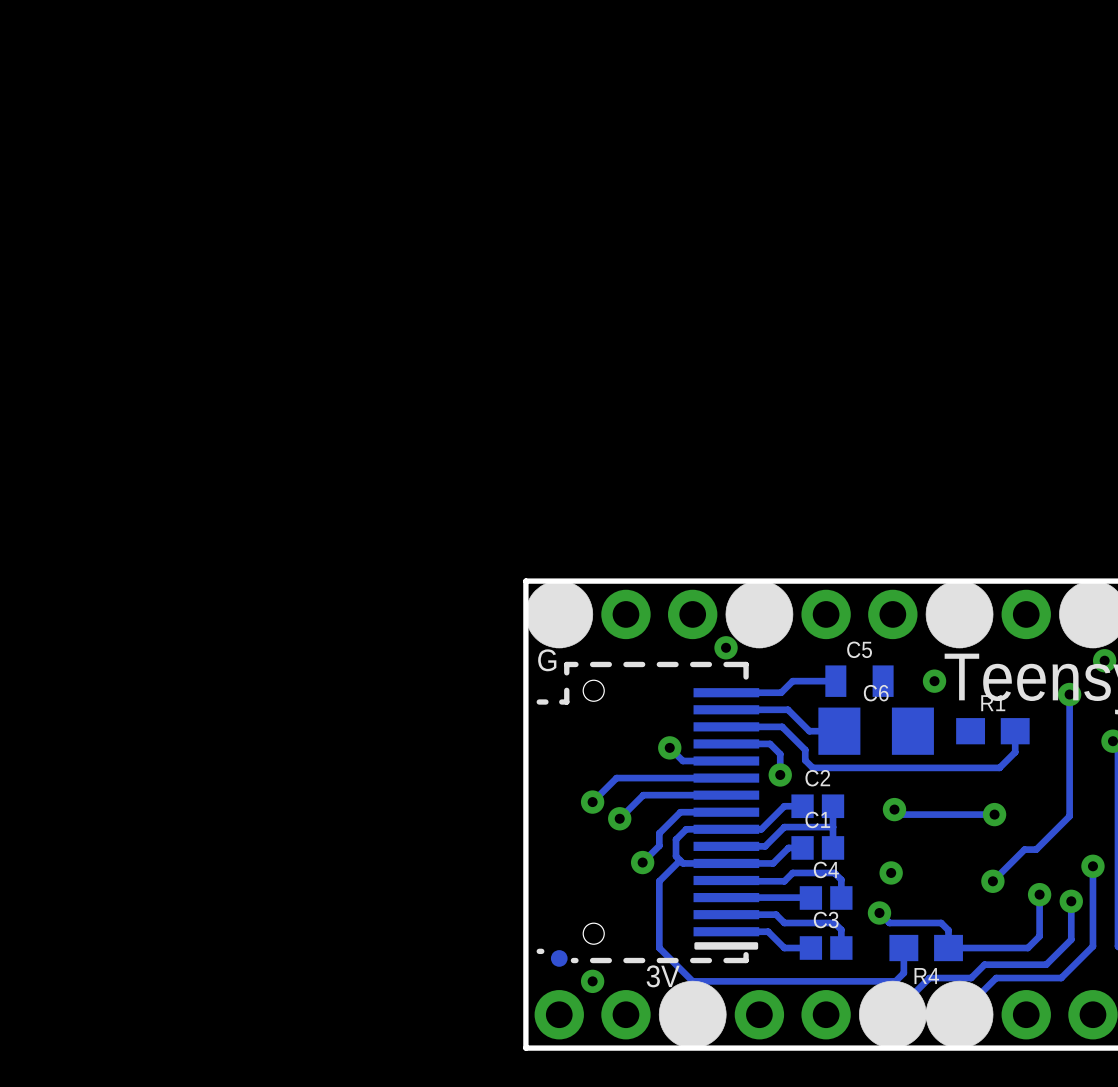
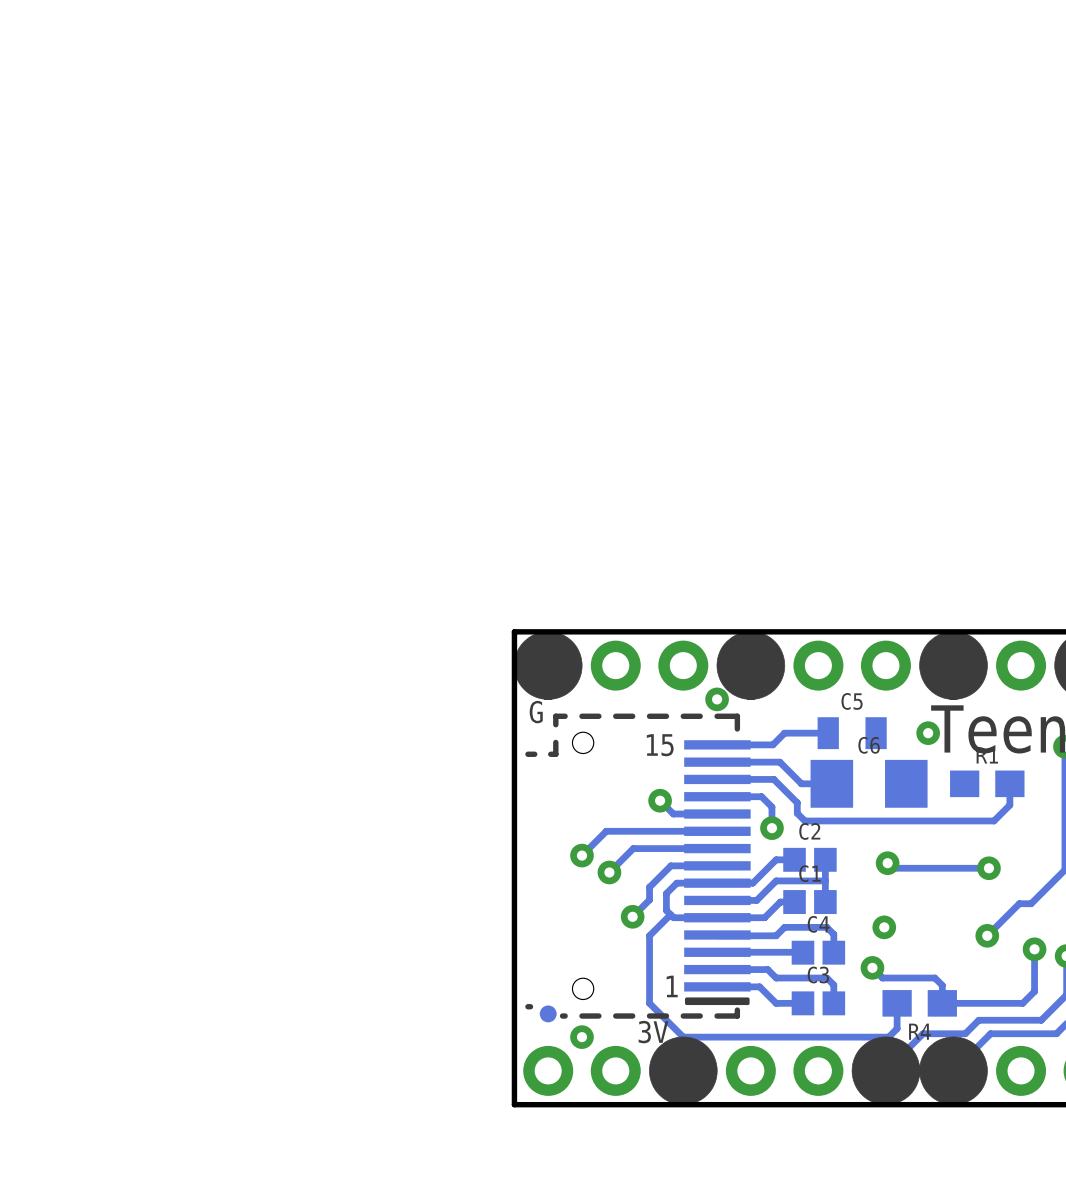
text: none -> 15 (660, 745)
text: none -> 1 (672, 986)

